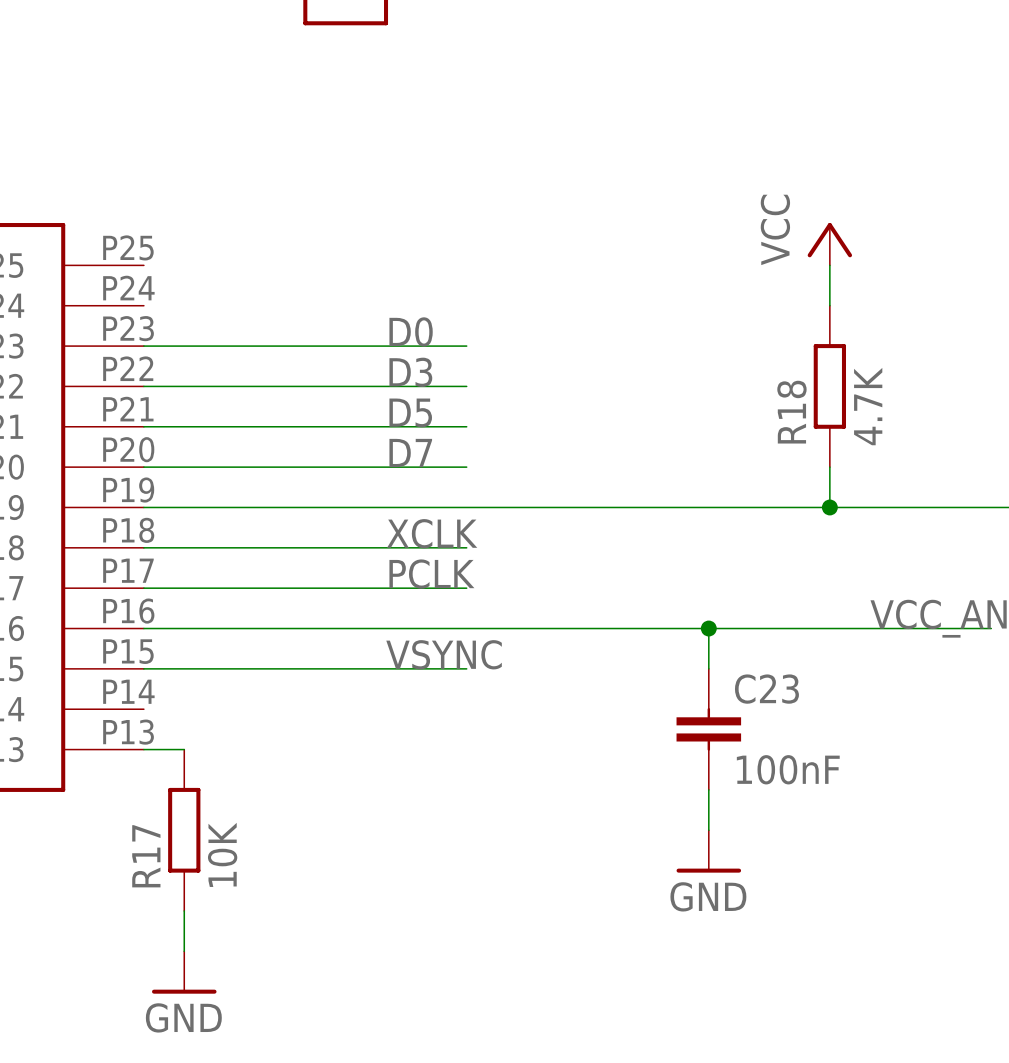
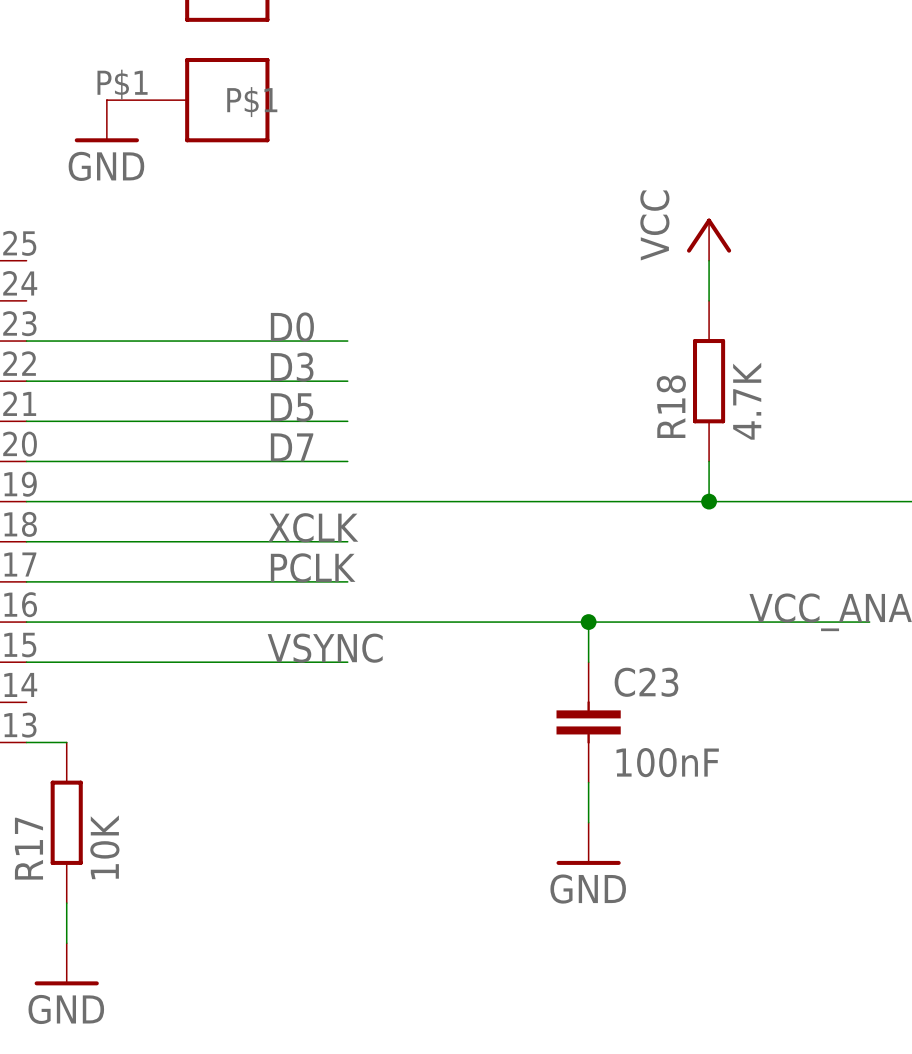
part: none -> (188, 100)
power symbol: none -> GND (106, 121)

